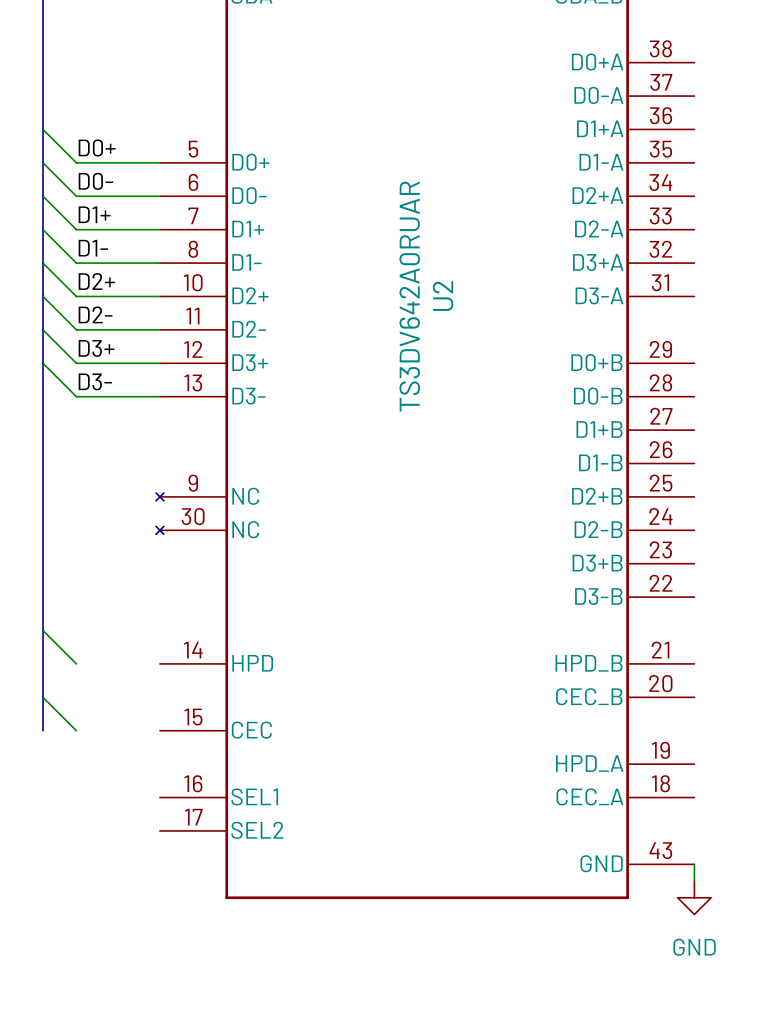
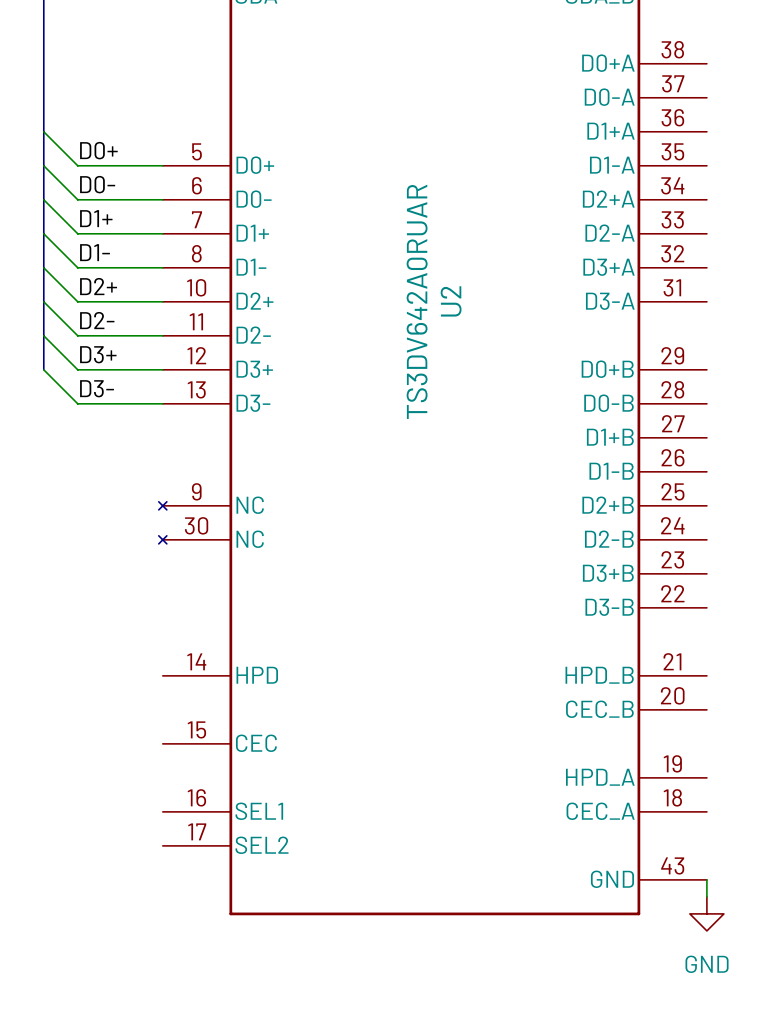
bus: (43, 363) (43, 730) -> none
wire: (43, 630) (76, 663) -> none
wire: (43, 697) (76, 730) -> none

